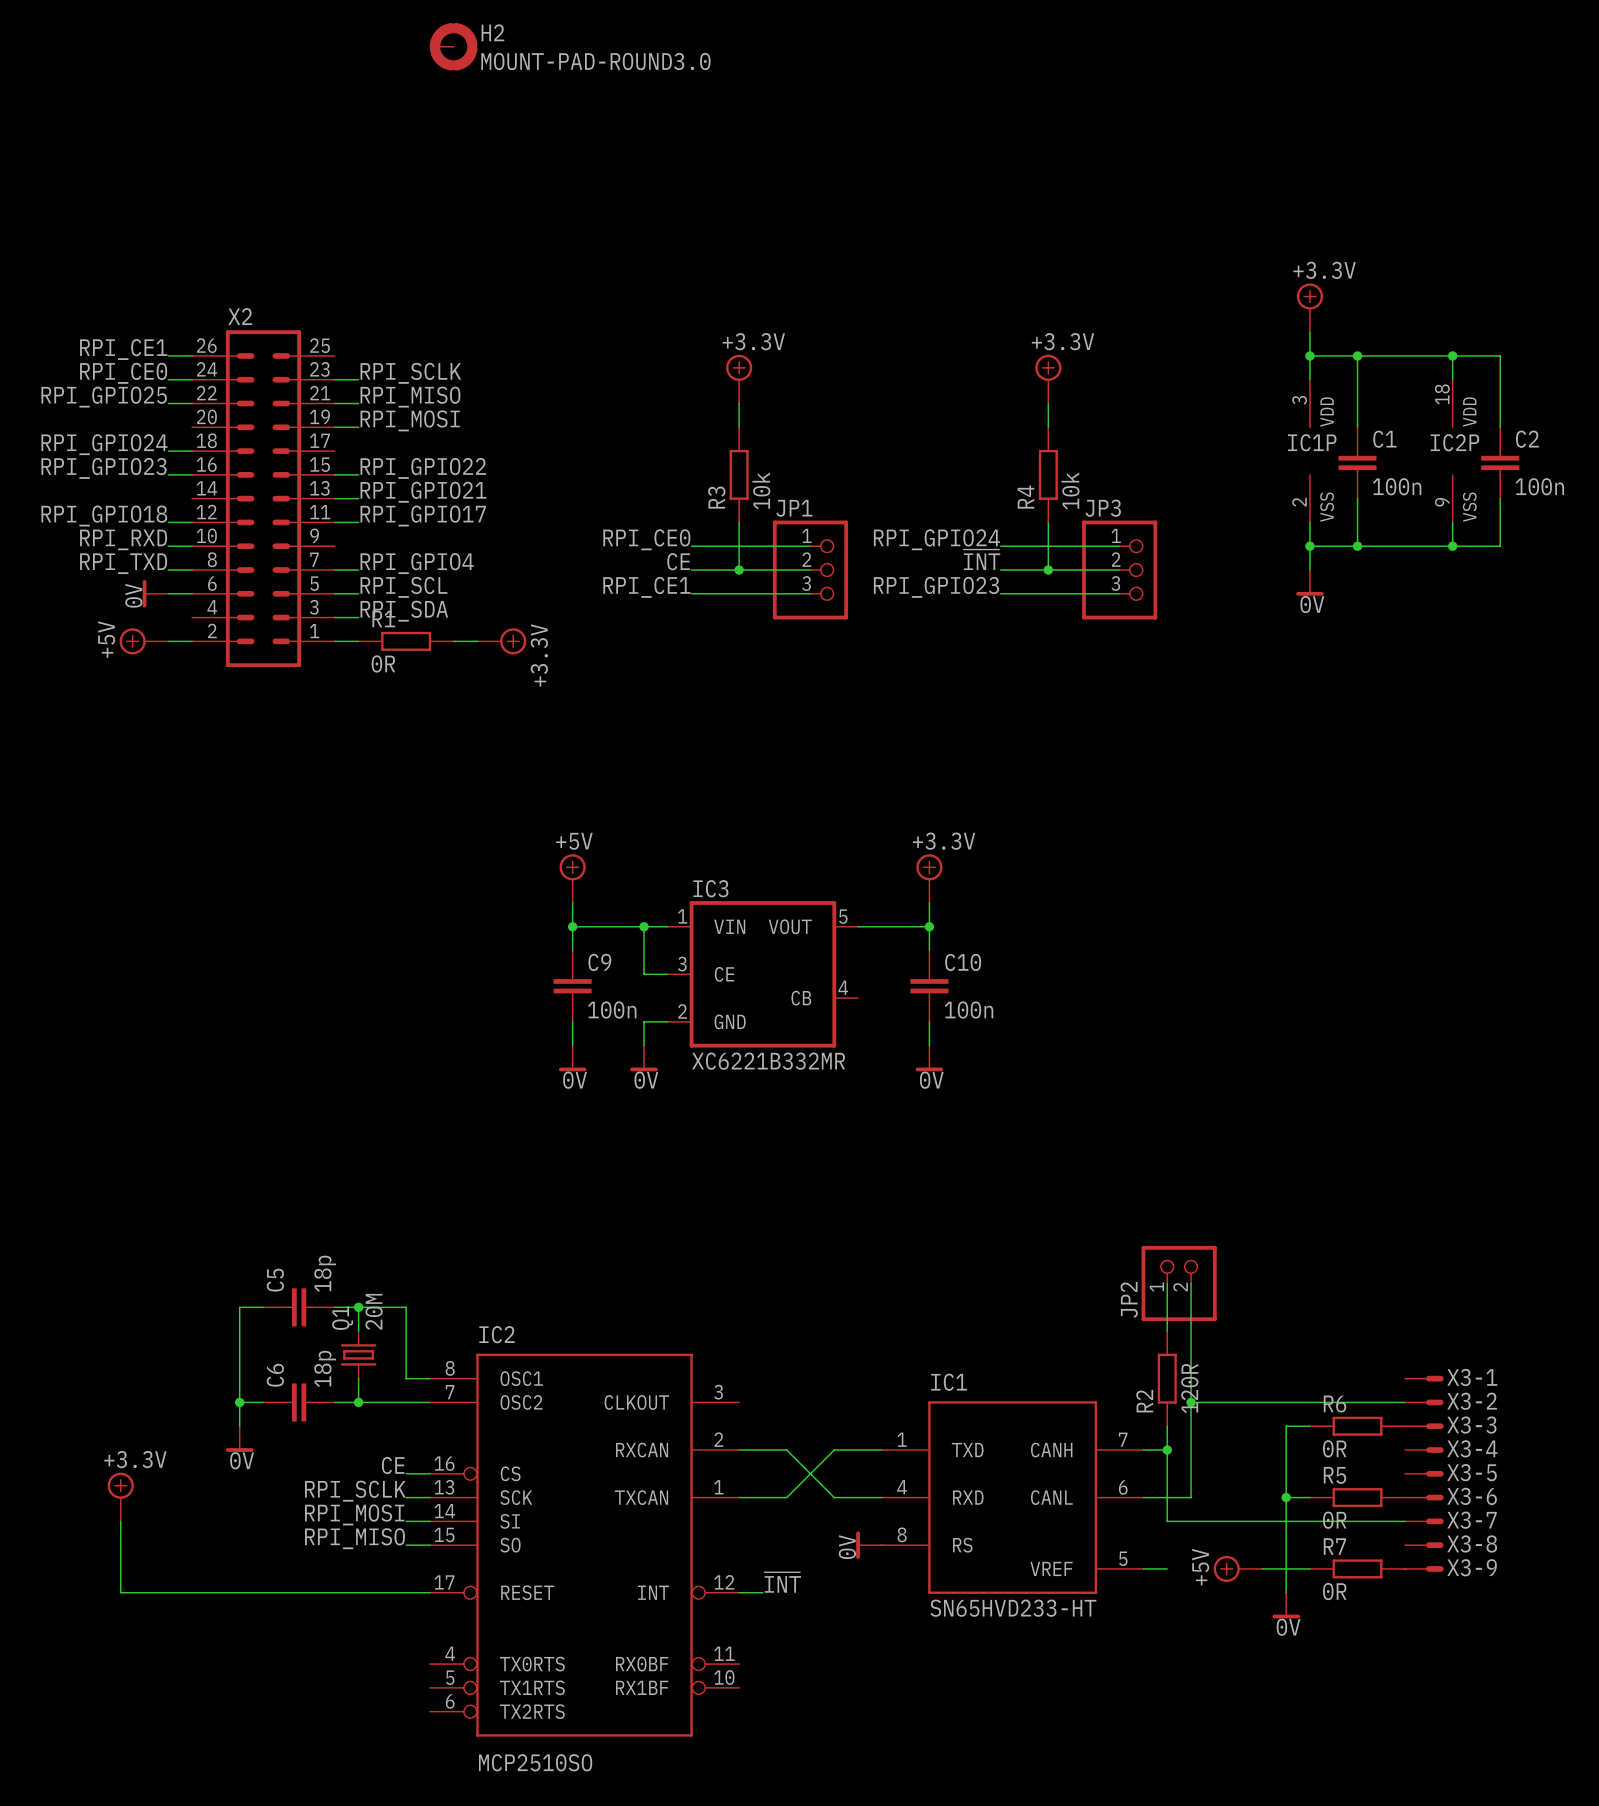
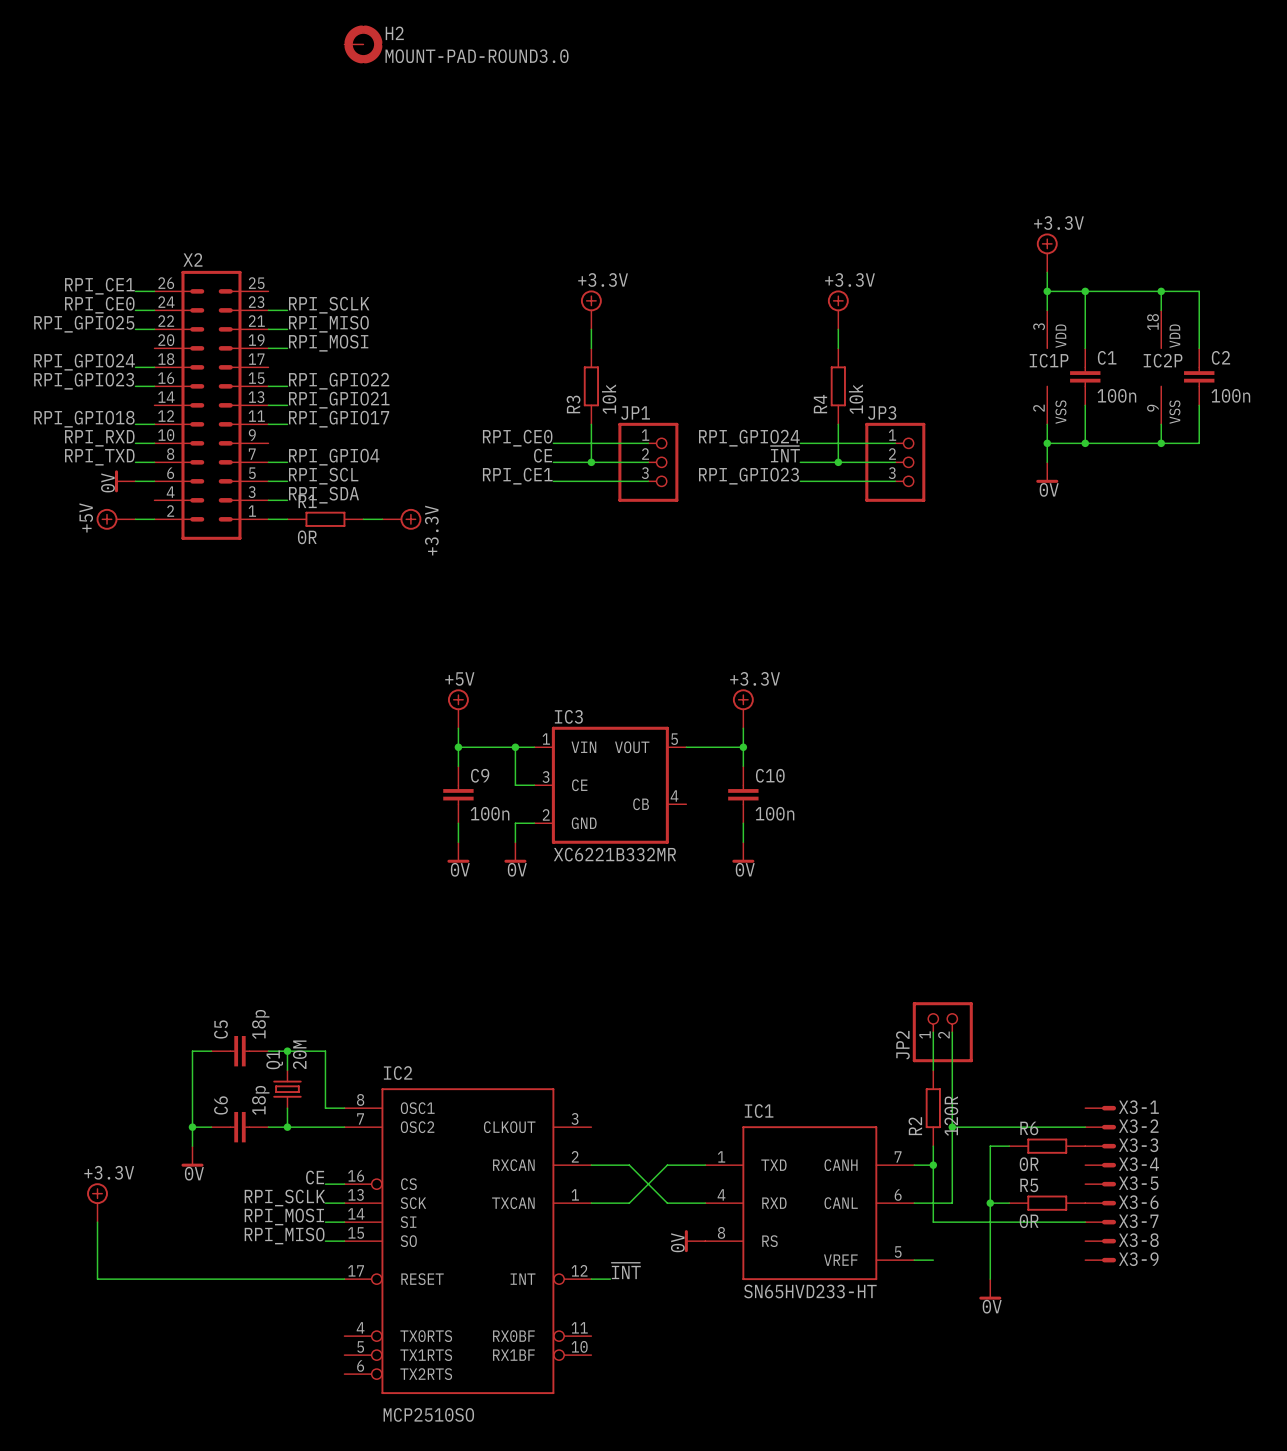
X3-1 position: (1424, 1378) -> (1100, 1108)
X3-2 position: (1424, 1402) -> (1100, 1127)
wire: (1309, 1426) (1286, 1426) (1286, 1592) -> (1009, 1146) (990, 1146) (990, 1279)
R6 position: (1357, 1426) -> (1047, 1146)
X3-3 position: (1424, 1426) -> (1100, 1146)
X3-4 position: (1424, 1450) -> (1100, 1165)
X3-5 position: (1424, 1473) -> (1100, 1184)
wire: (1286, 1497) (1309, 1497) -> (990, 1203) (1009, 1203)
junction position: (1286, 1497) -> (990, 1203)
R5 position: (1357, 1497) -> (1047, 1203)
X3-6 position: (1424, 1497) -> (1100, 1203)
X3-7 position: (1424, 1521) -> (1100, 1222)
X3-8 position: (1424, 1545) -> (1100, 1241)
power symbol: +5V (1238, 1568) -> none
wire: (1262, 1568) (1309, 1568) -> none
R7: 0R (1357, 1568) -> none
X3-9 position: (1424, 1568) -> (1100, 1260)
power symbol position: 0V (1286, 1605) -> 0V (990, 1289)

